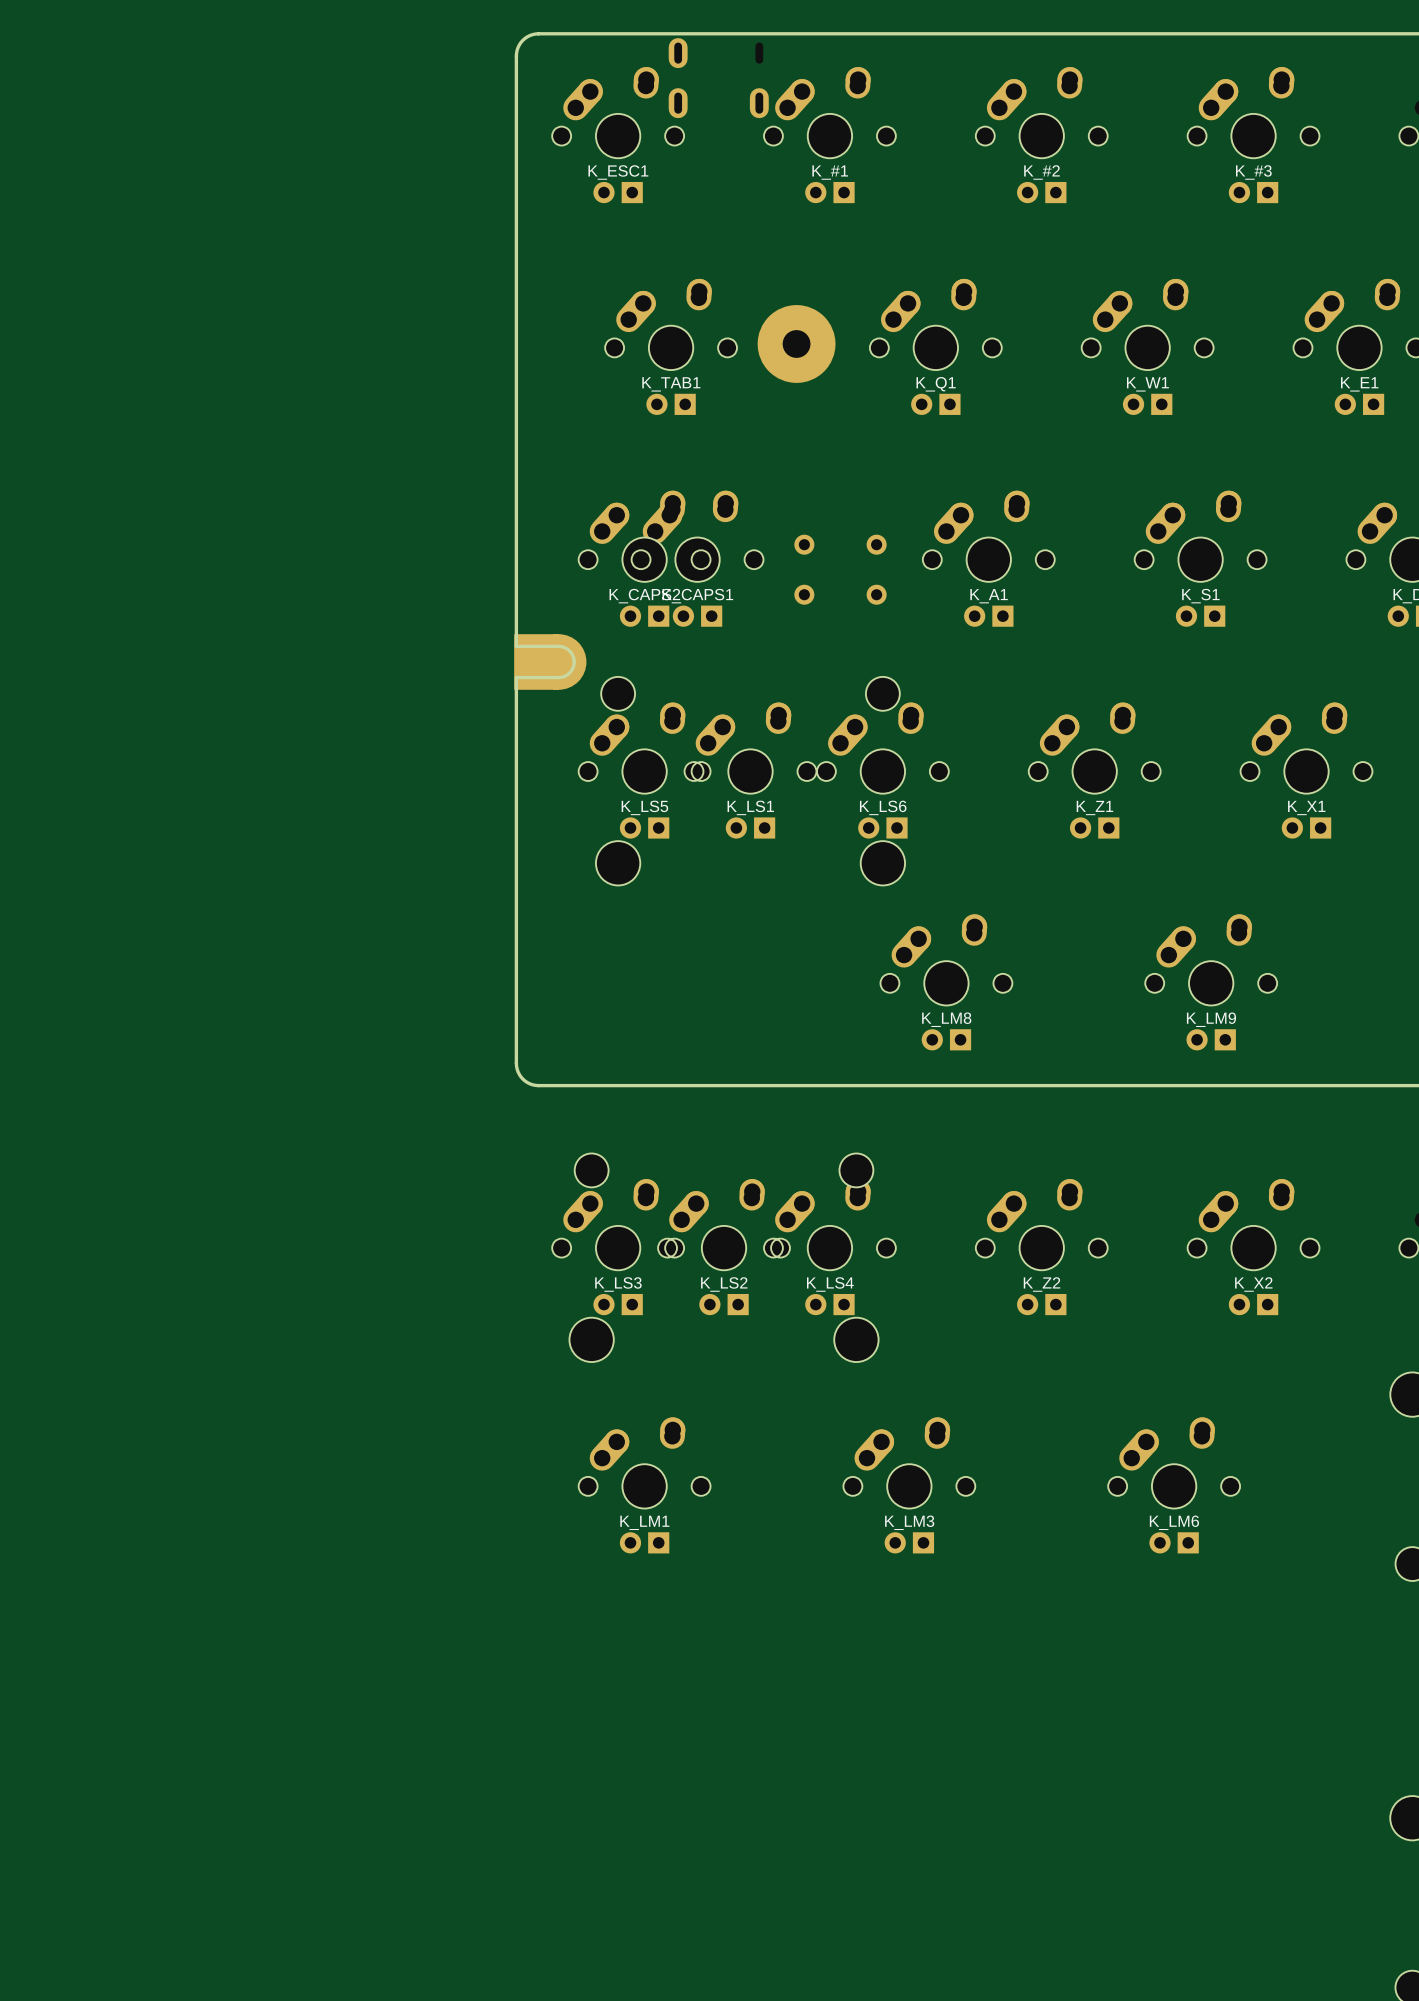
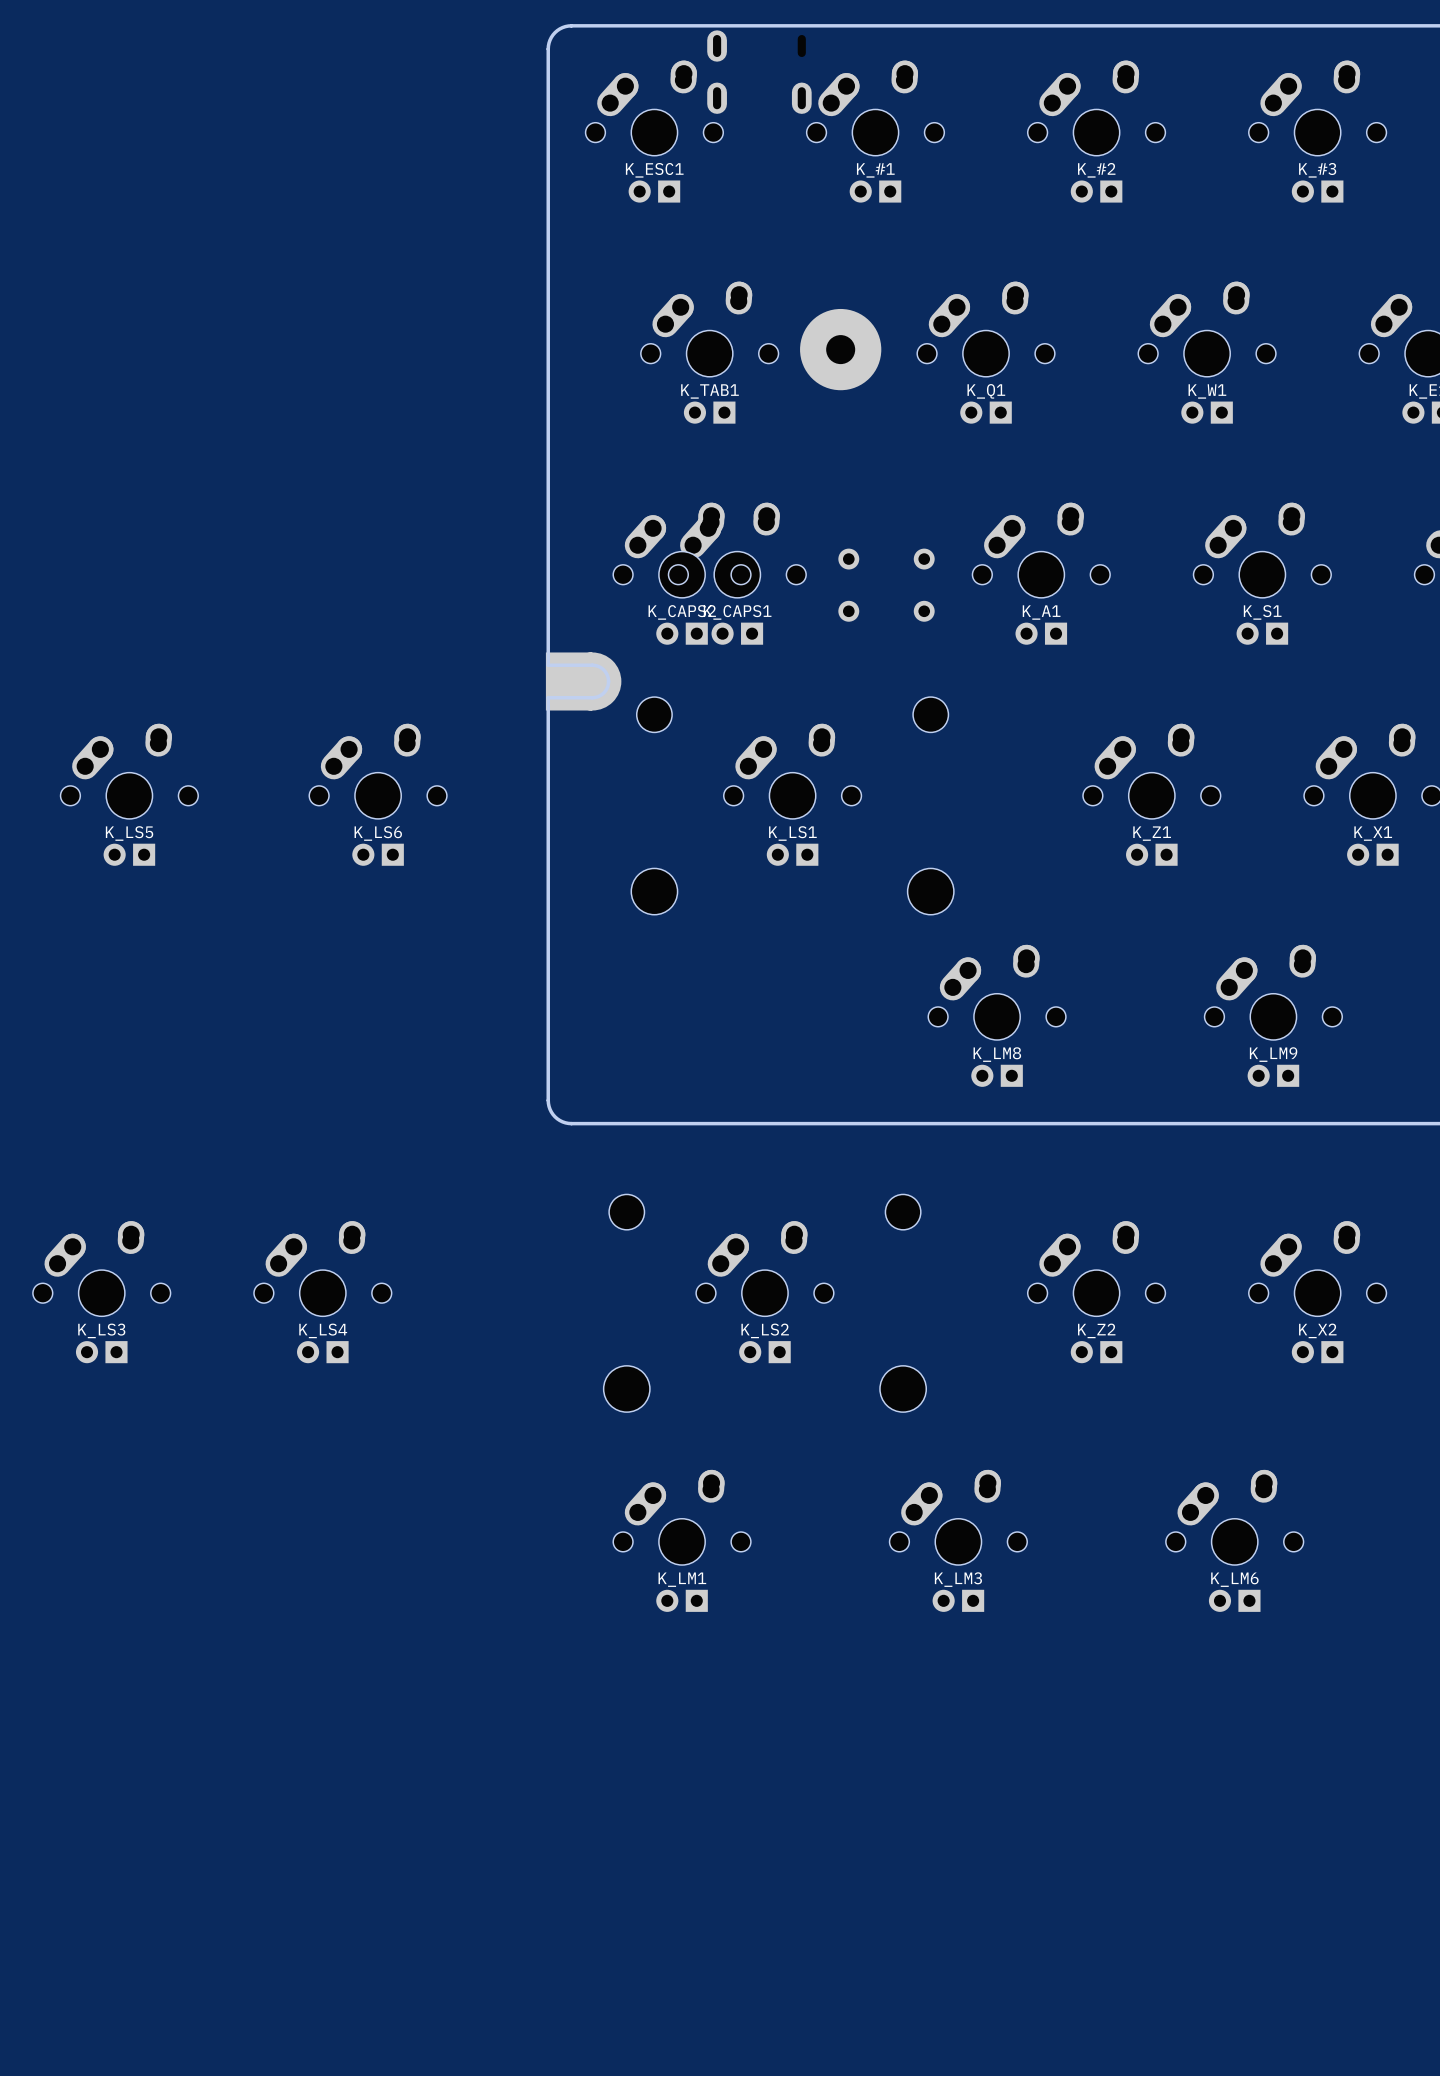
K_LS5 position: (644, 770) -> (129, 794)
K_LS6 position: (882, 770) -> (378, 794)
K_LS3 position: (618, 1247) -> (101, 1292)
K_LS4 position: (829, 1247) -> (322, 1292)

